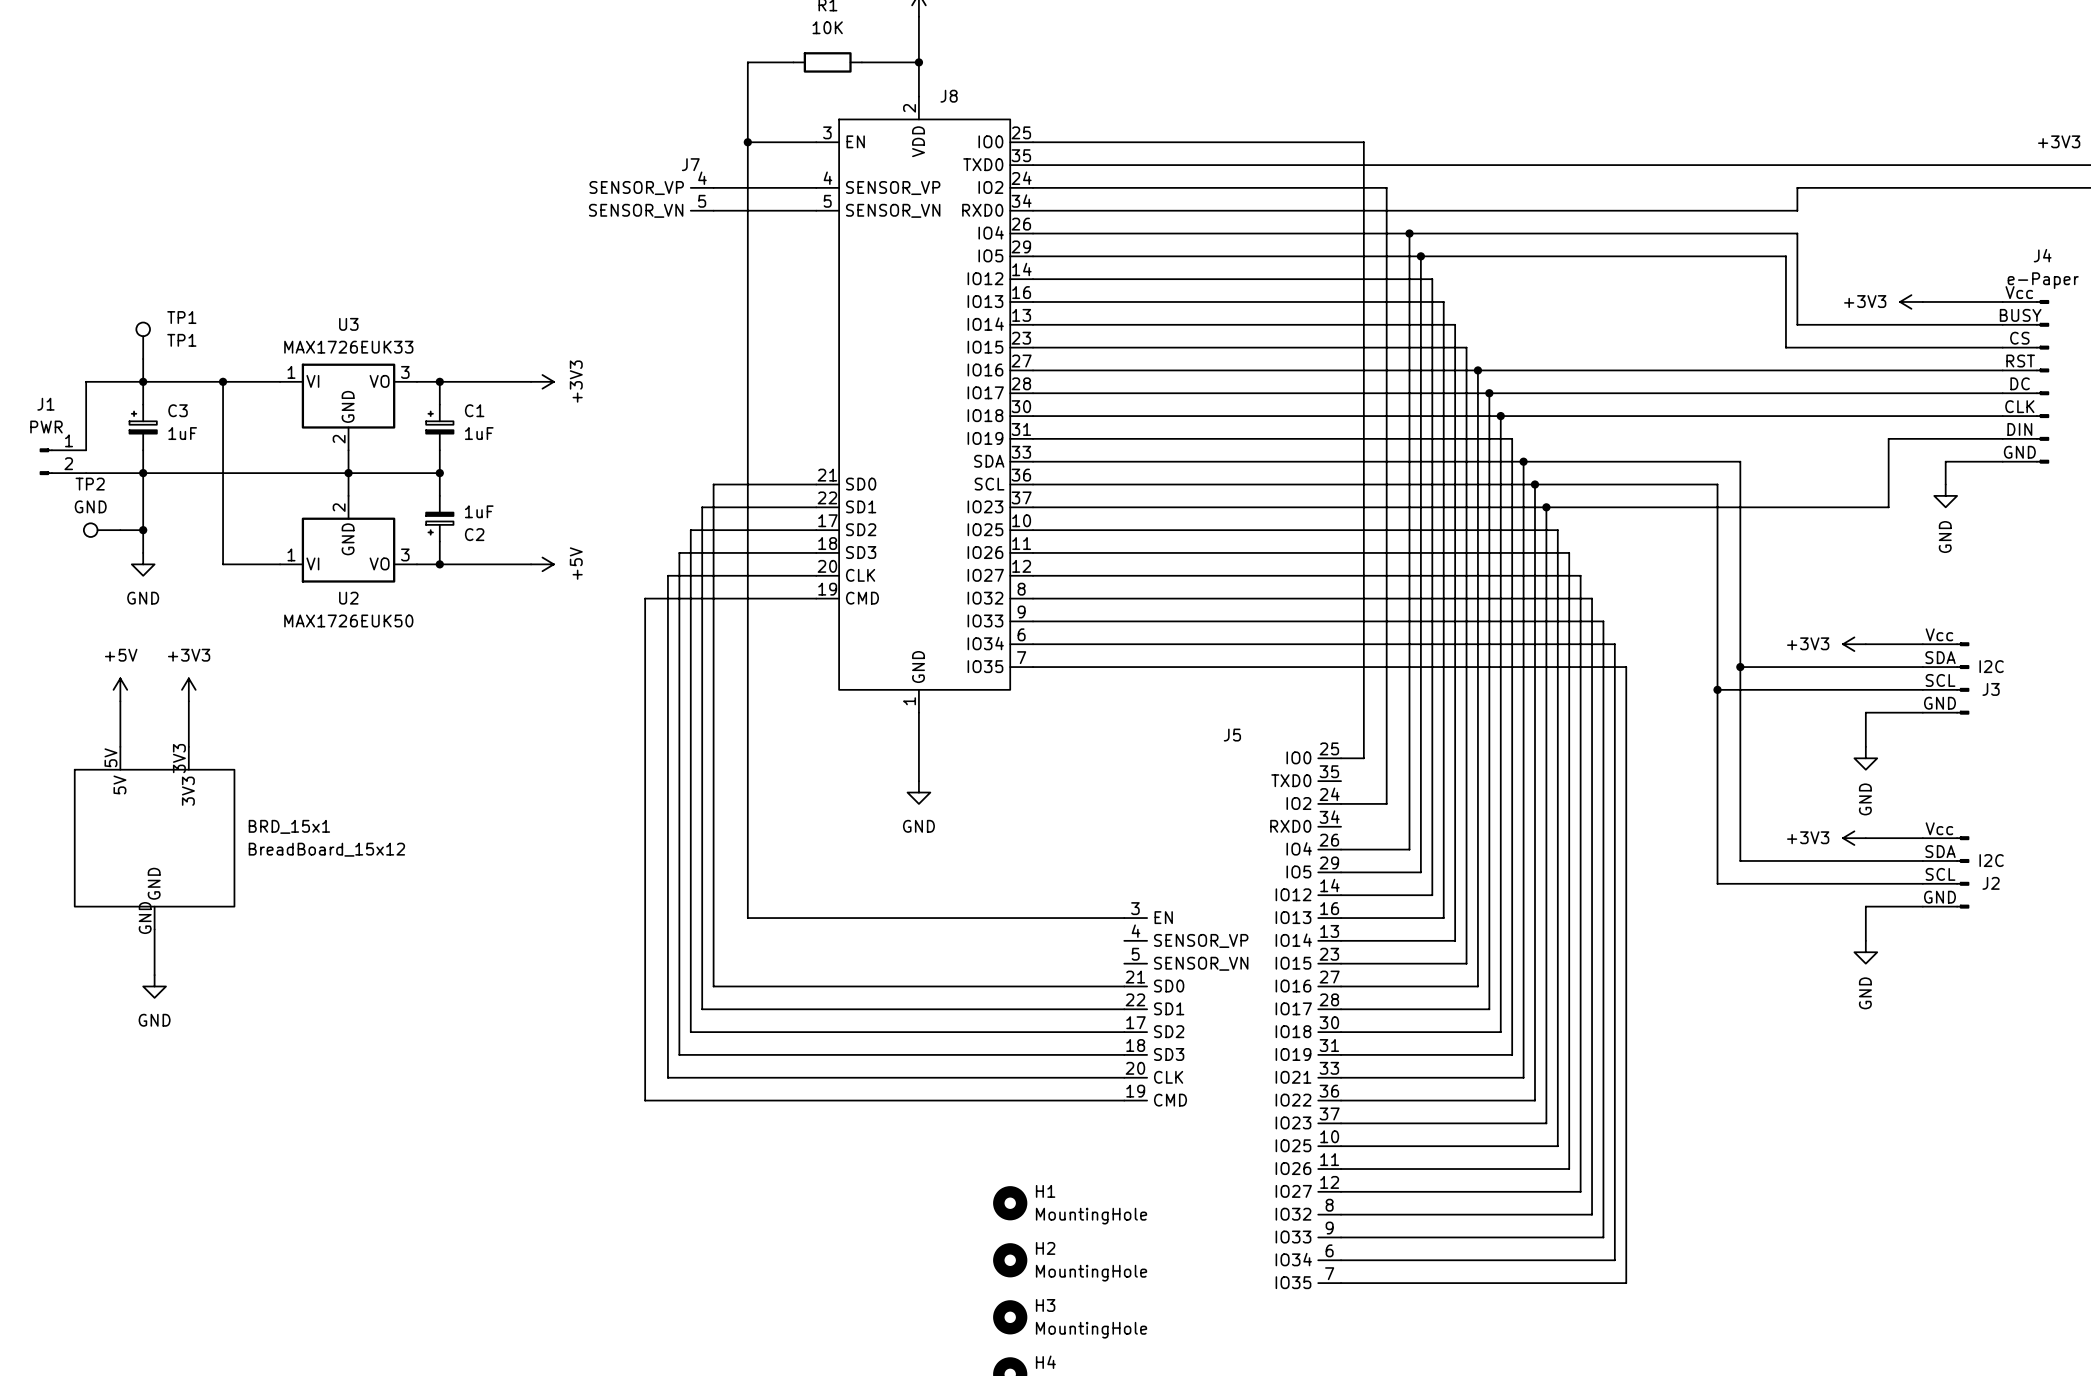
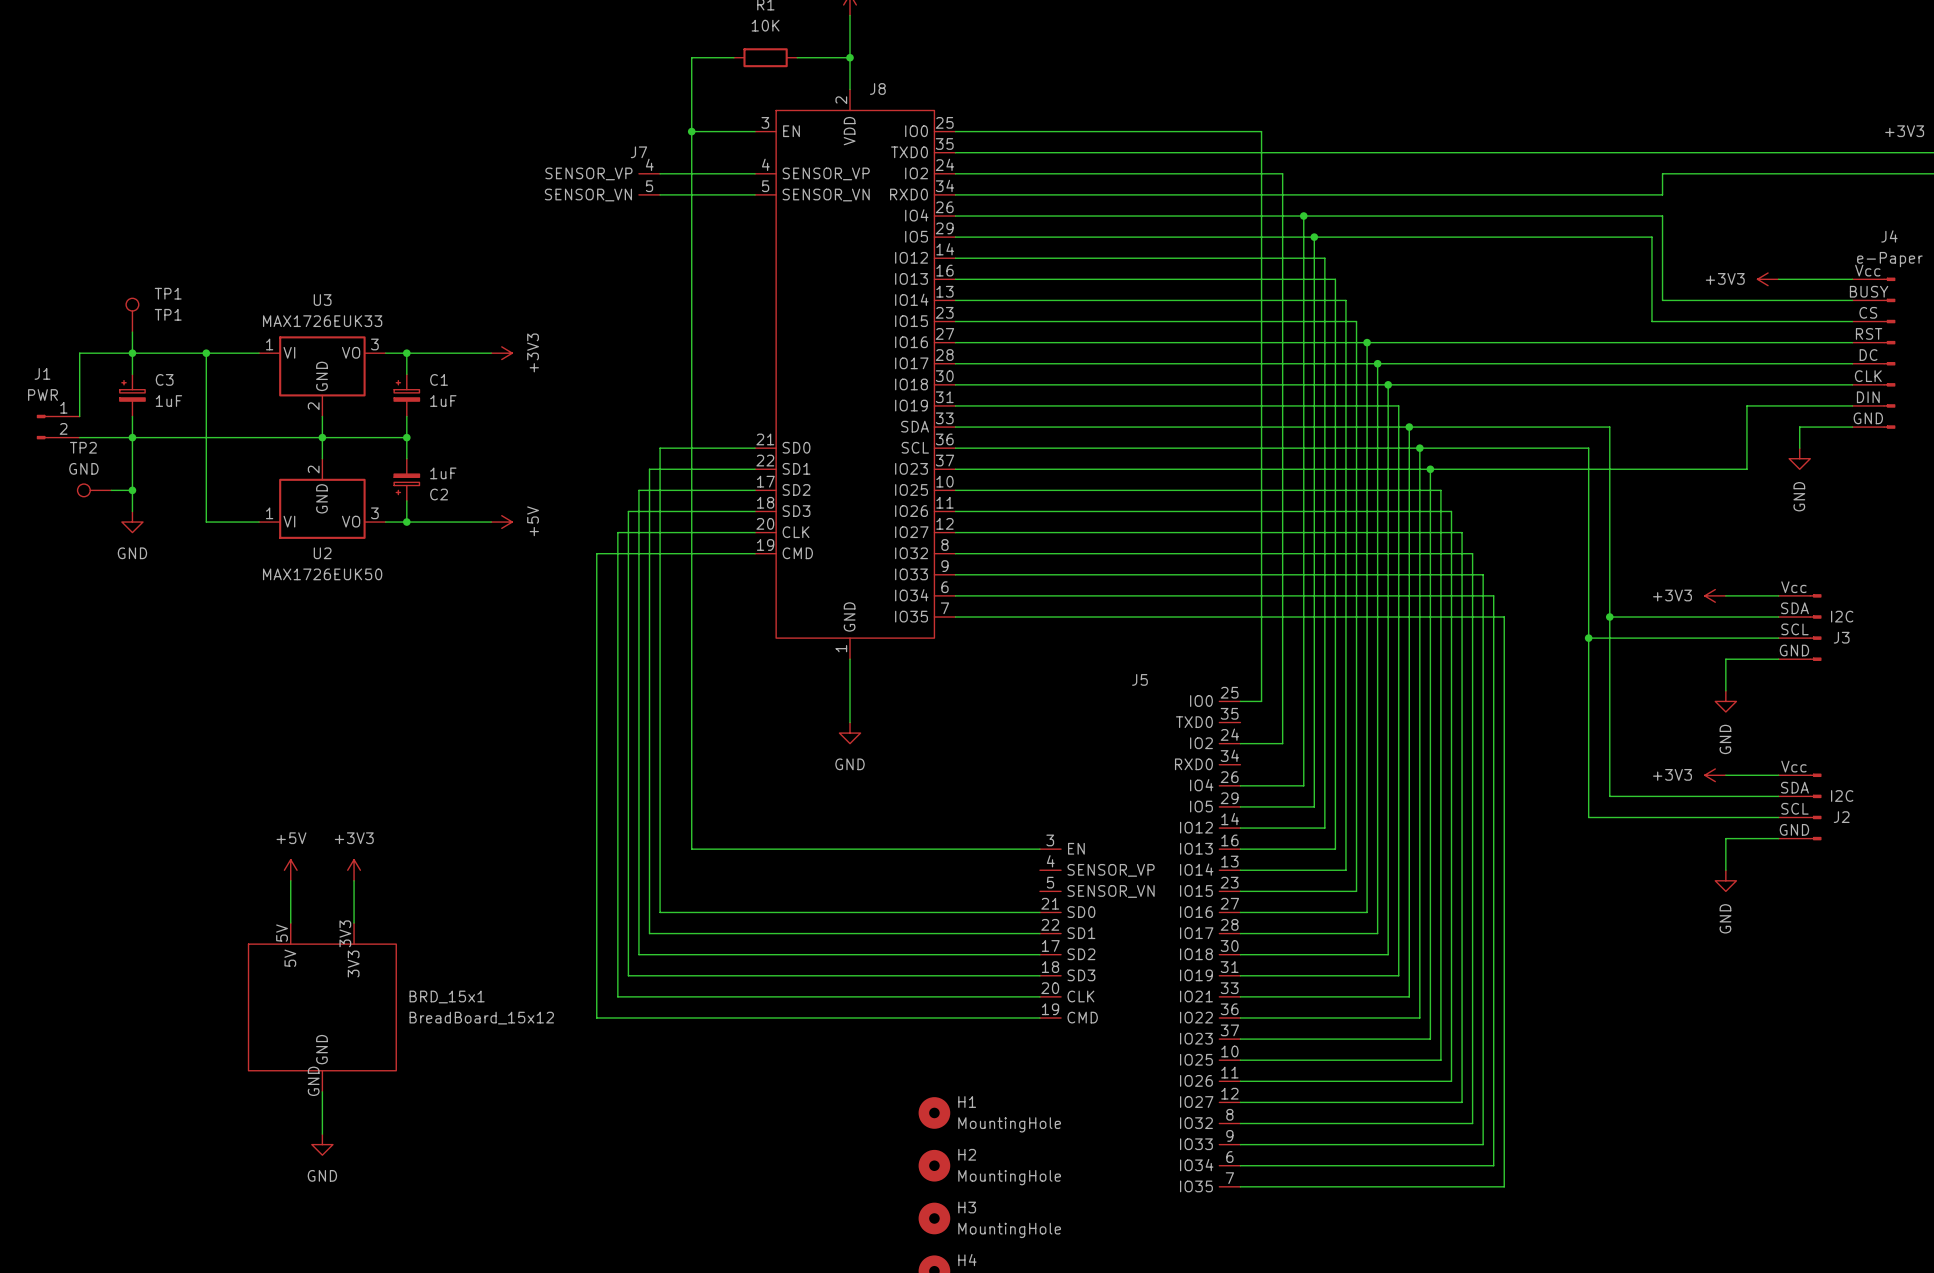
power symbol: +5V (120, 689) -> none
power symbol: +3V3 (188, 689) -> none
wire: (120, 701) (120, 746) -> none
wire: (188, 701) (188, 746) -> none
BRD_15x1 position: (154, 838) -> (322, 1007)
wire: (154, 929) (154, 975) -> (290, 880) (290, 923)
power symbol: none -> +5V (290, 870)
power symbol: none -> +3V3 (354, 870)
wire: none -> (354, 880) (354, 923)
power symbol: GND (154, 986) -> none
wire: none -> (322, 1091) (322, 1134)
power symbol: none -> GND (322, 1144)

